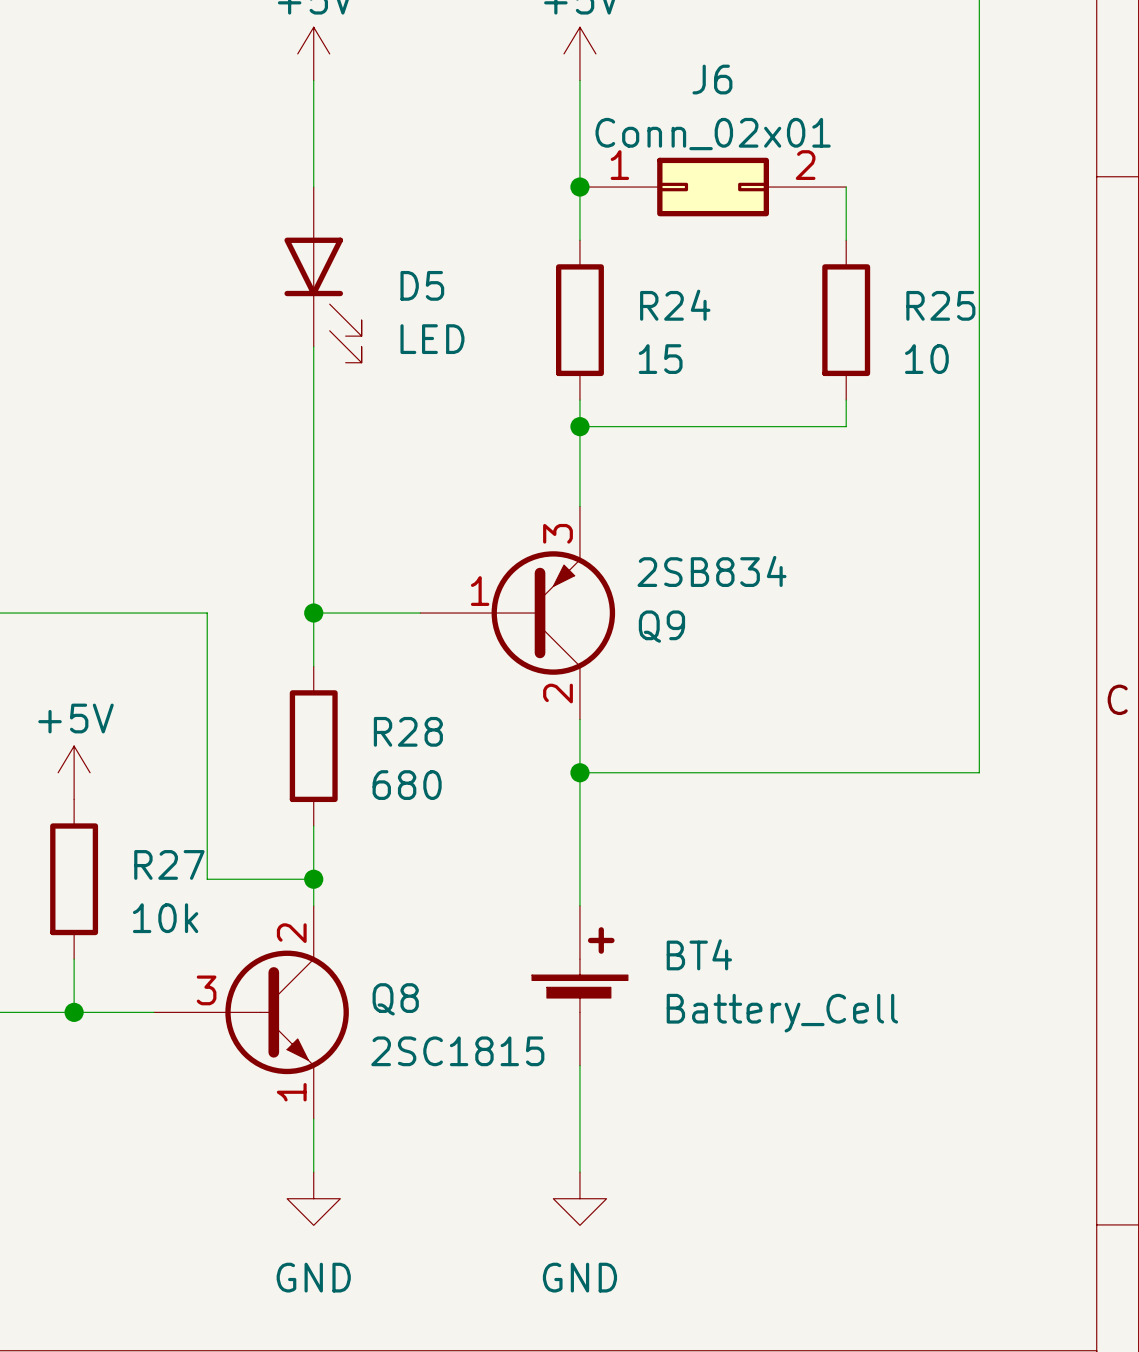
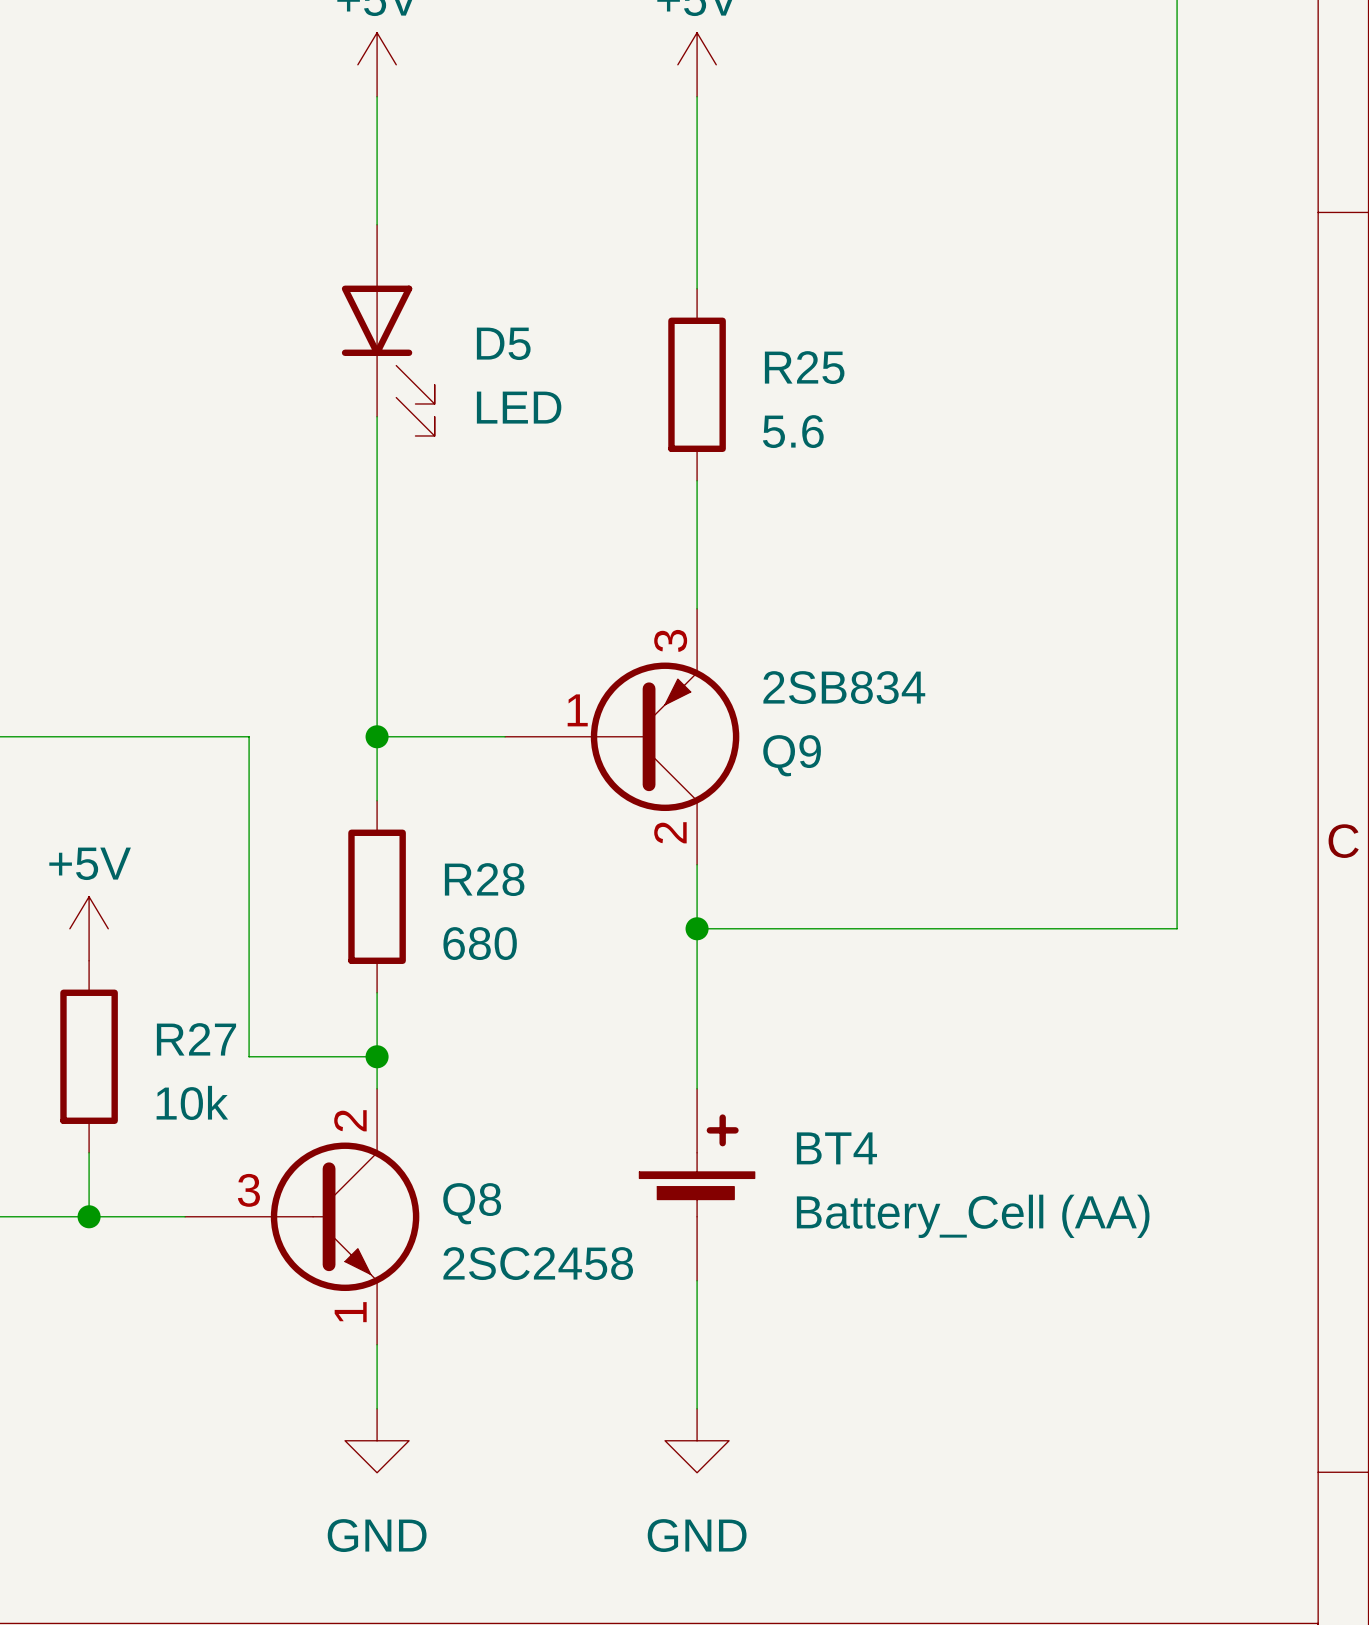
junction: (579, 187) -> none
J6: Conn_02x01 (713, 187) -> none
wire: (846, 187) (846, 240) -> none
R24 name: R24 (675, 305) -> R25 (804, 367)
R25: 10 (846, 320) -> none
R24 value: 15 (660, 359) -> 5.6 (793, 431)
wire: (846, 400) (846, 426) (579, 426) -> none
junction: (579, 426) -> none
BT4 value: Battery_Cell (782, 1013) -> Battery_Cell (AA) (973, 1216)
Q8 value: 2SC1815 (457, 1051) -> 2SC2458 (538, 1263)

